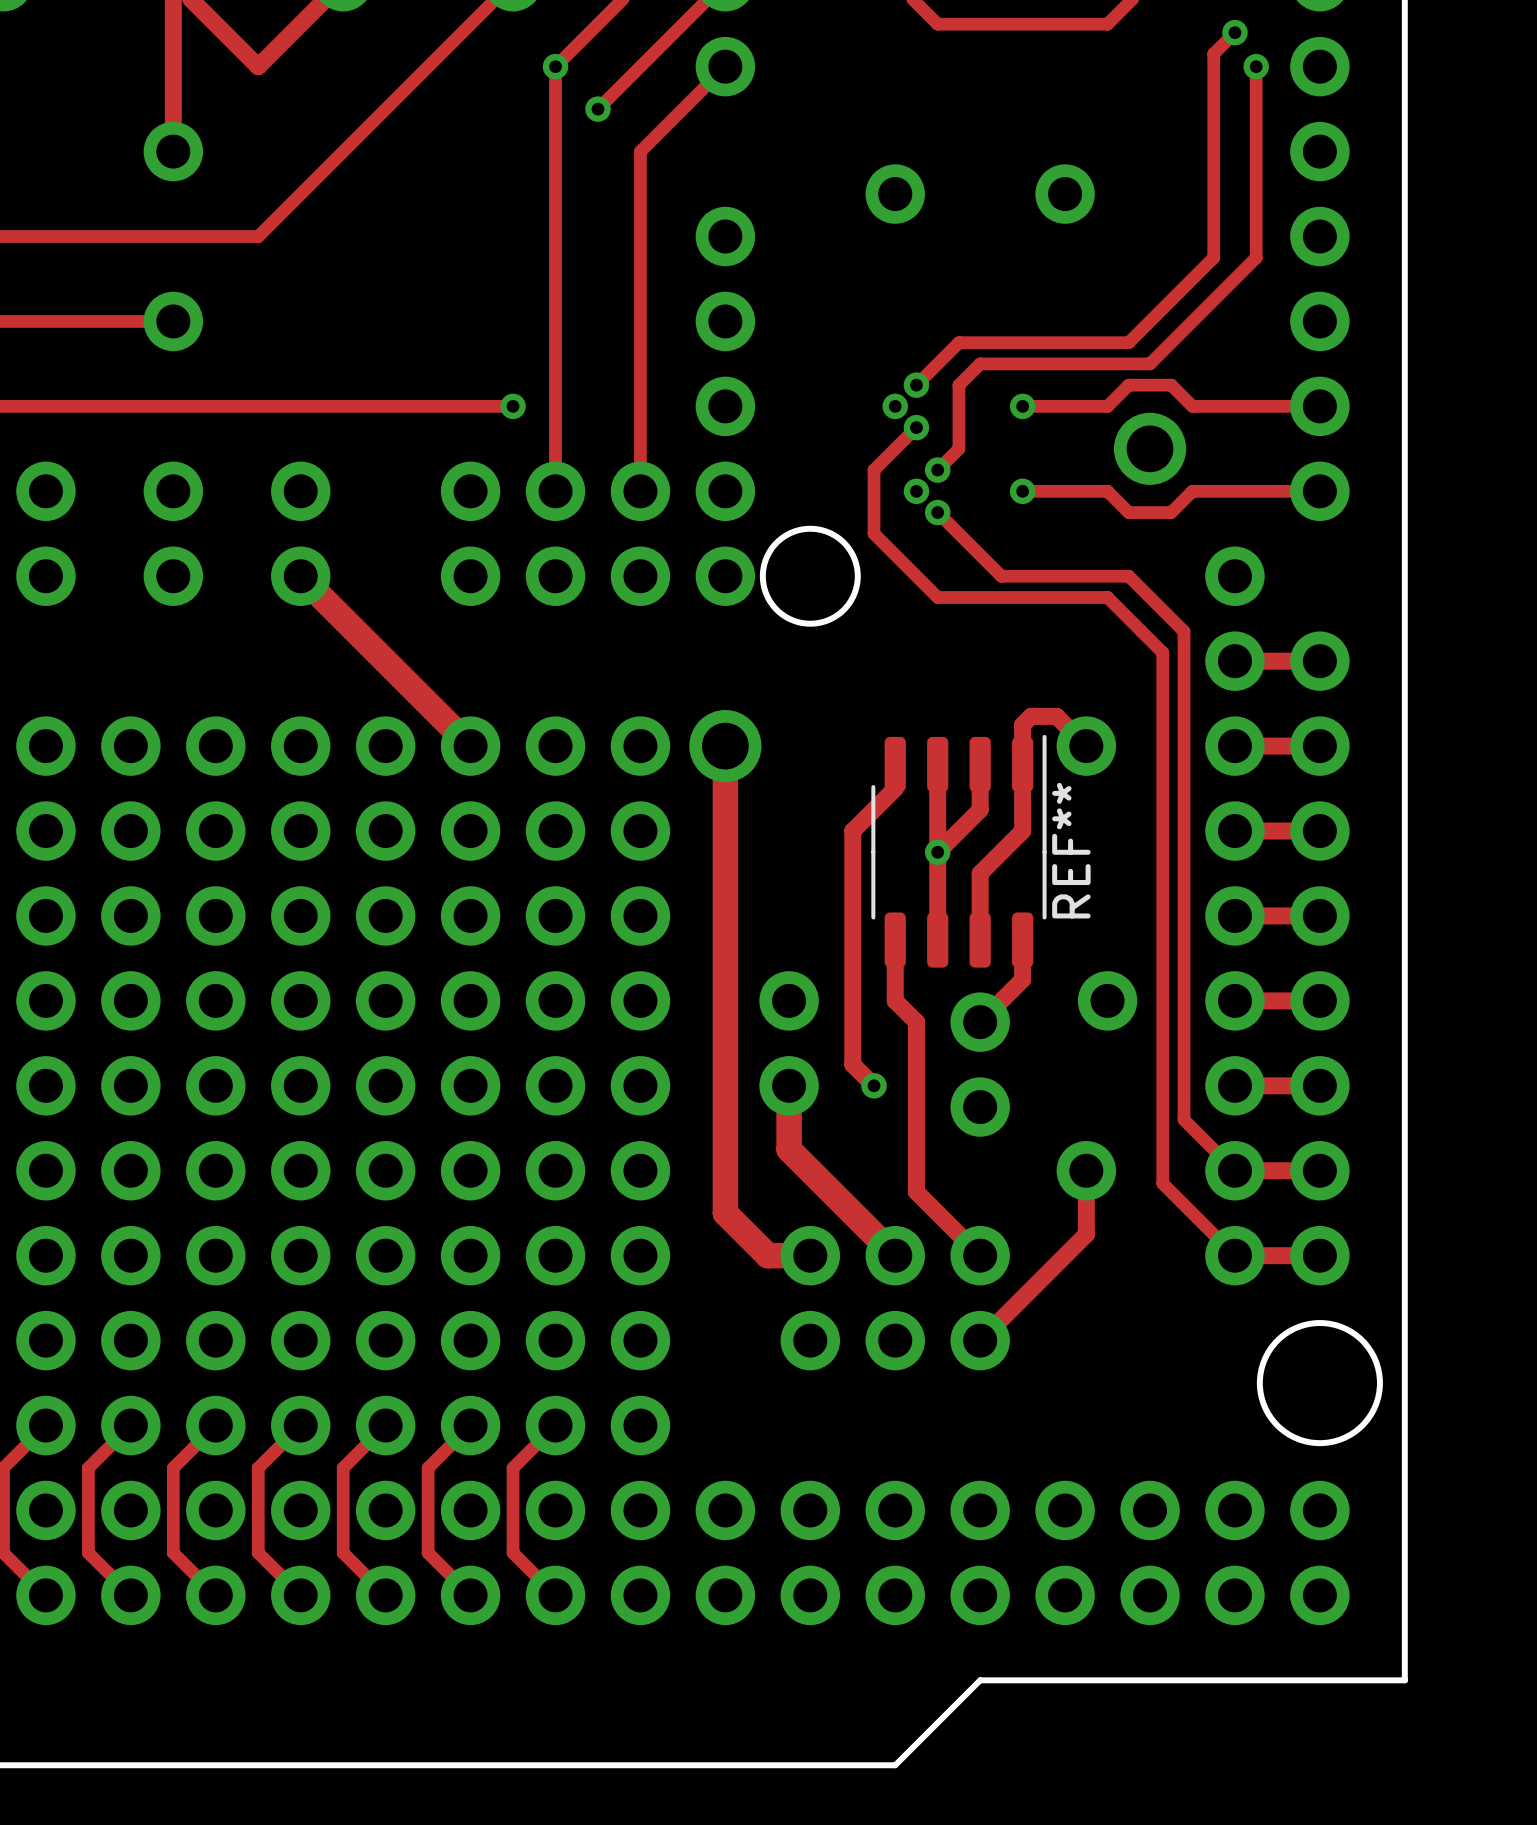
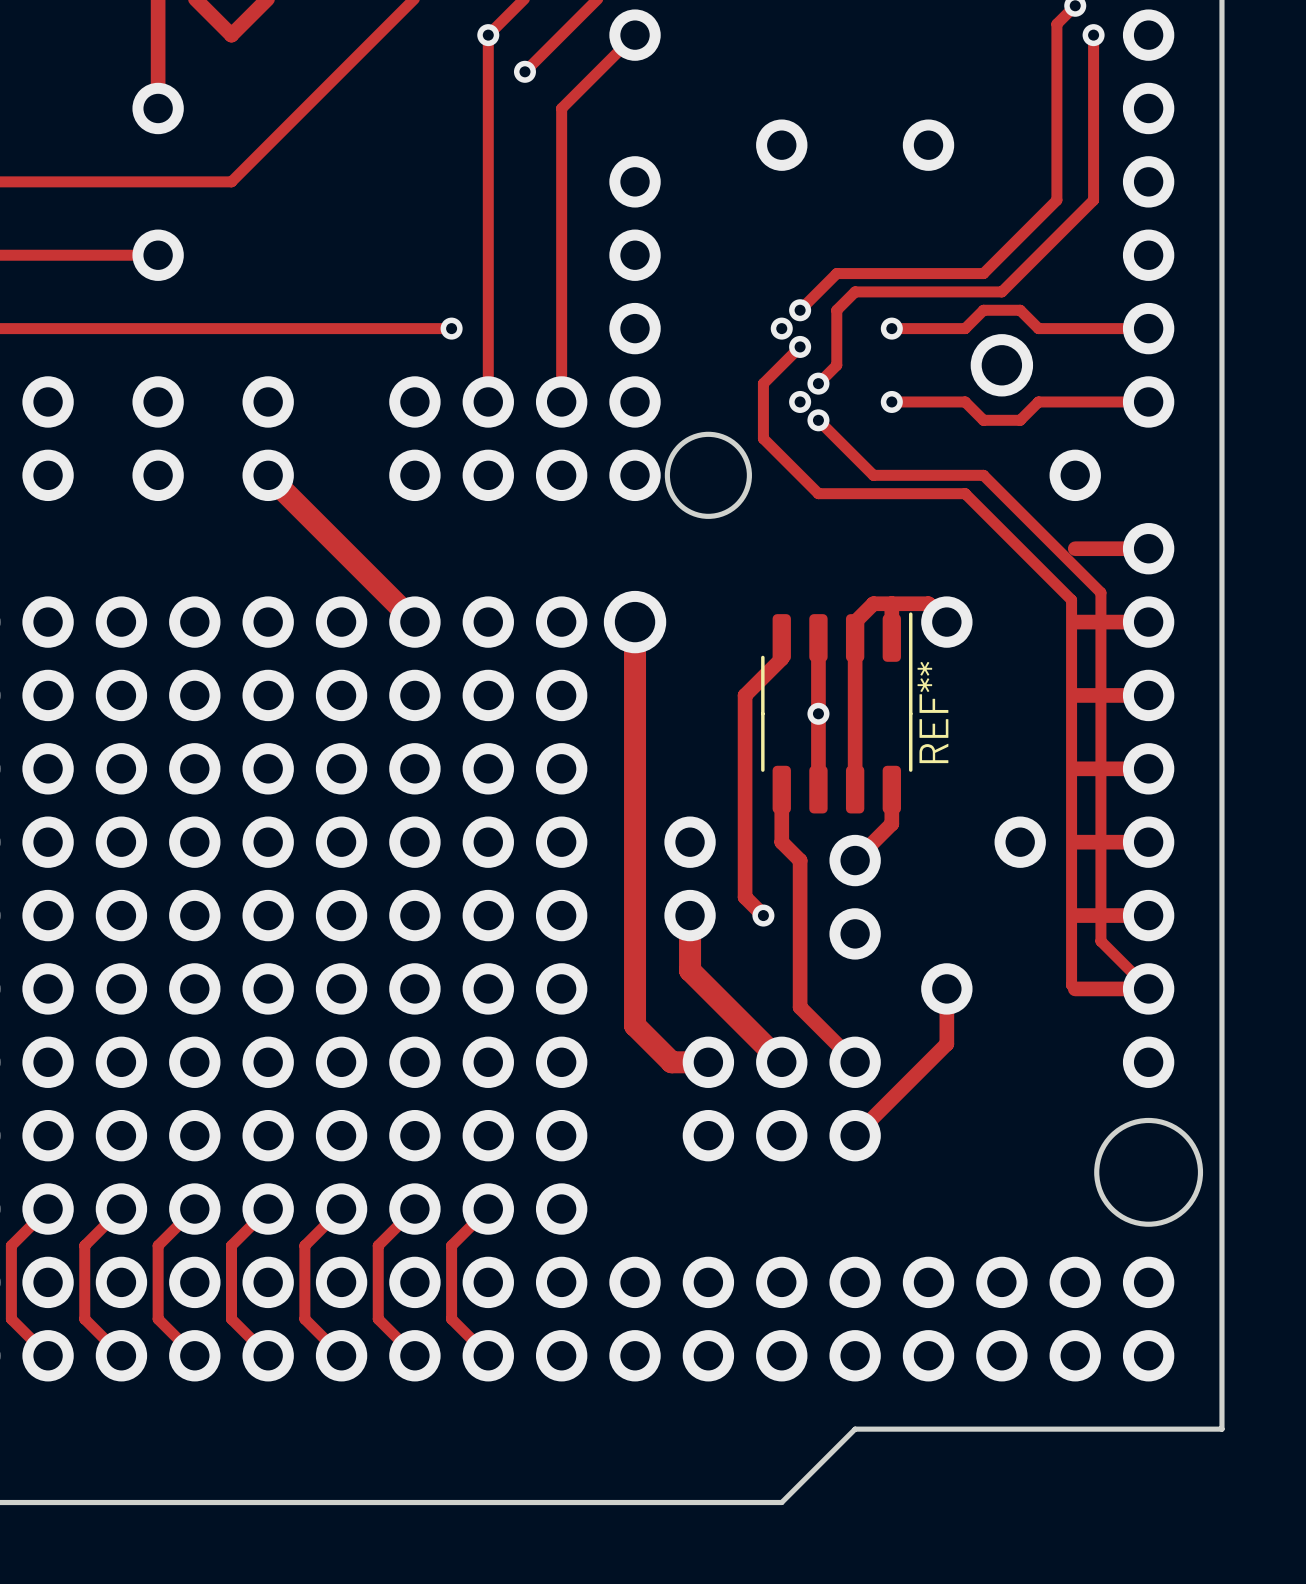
track: (1184, 631) (1184, 1119) (1230, 1166) -> (1012, 541) (1071, 600) (1071, 985)
track: none -> (1031, 523) (1100, 592) (1100, 941) (1148, 988)
track: (1162, 652) (1162, 1183) (1234, 1255) (1319, 1255) -> none
via: (1234, 661) -> none
track: (1022, 724) (1031, 716) (1056, 716) (1065, 724) -> (855, 622) (873, 603) (928, 603)
via: (1234, 746) -> none
track: (1022, 764) (1022, 831) (980, 873) -> none
track: (980, 809) (937, 852) -> (855, 677) (855, 732)
via: (1234, 831) -> none
via: (1234, 915) -> none
via: (1107, 1000) -> none
via: none -> (1020, 842)
via: (1234, 1000) -> none
via: (1234, 1085) -> none
via: (1234, 1170) -> none
via: (1234, 1255) -> none

